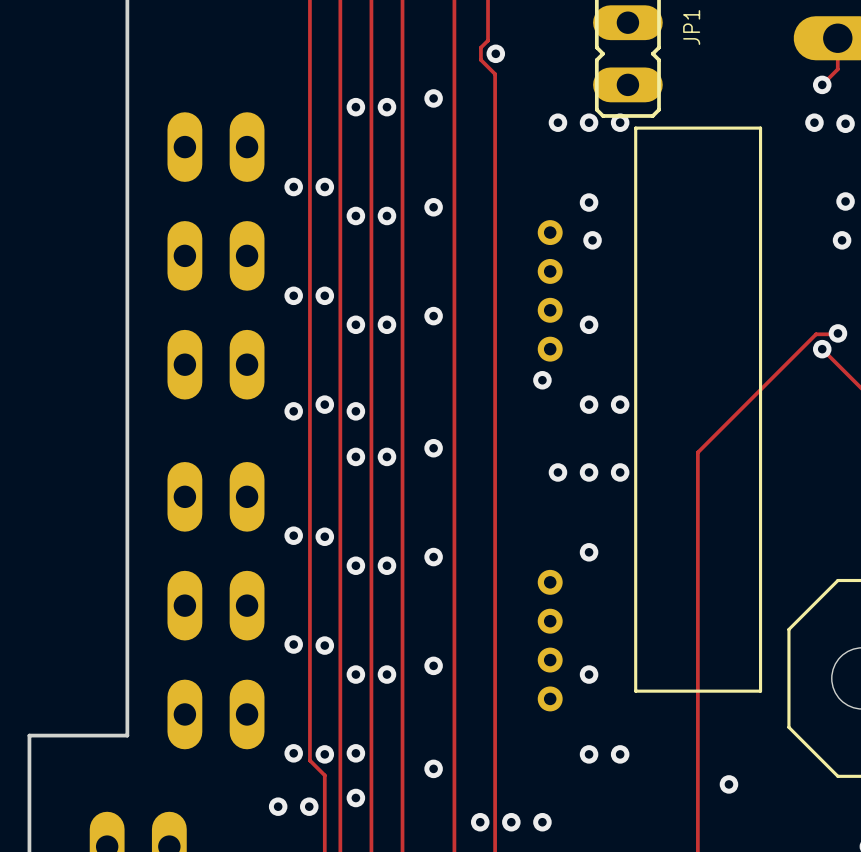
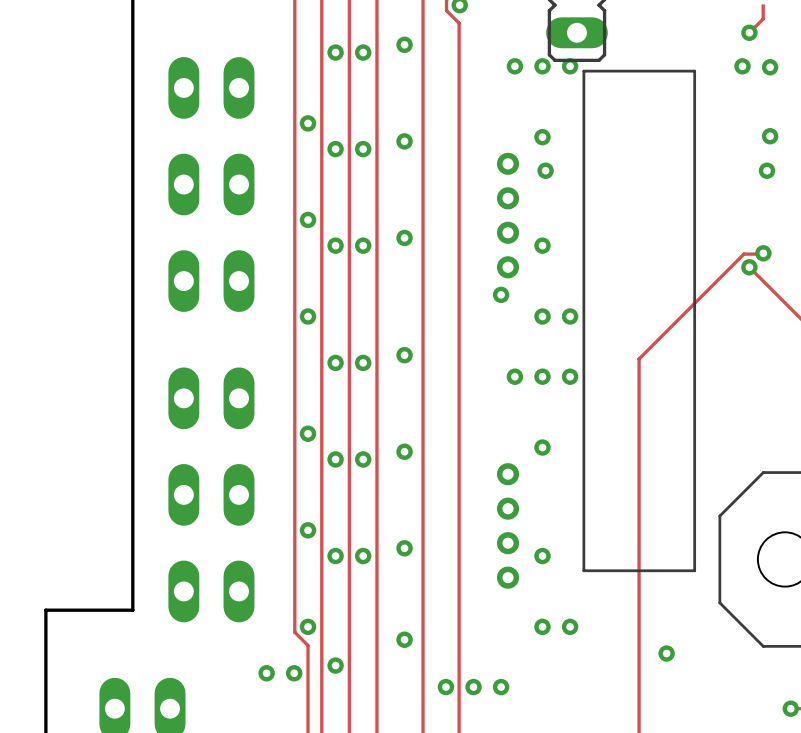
via: (293, 186) -> none
via: (293, 295) -> none
via: (293, 411) -> none
via: (355, 411) -> none
via: (293, 535) -> none
via: (293, 644) -> none
via: (293, 753) -> none
via: (355, 753) -> none

